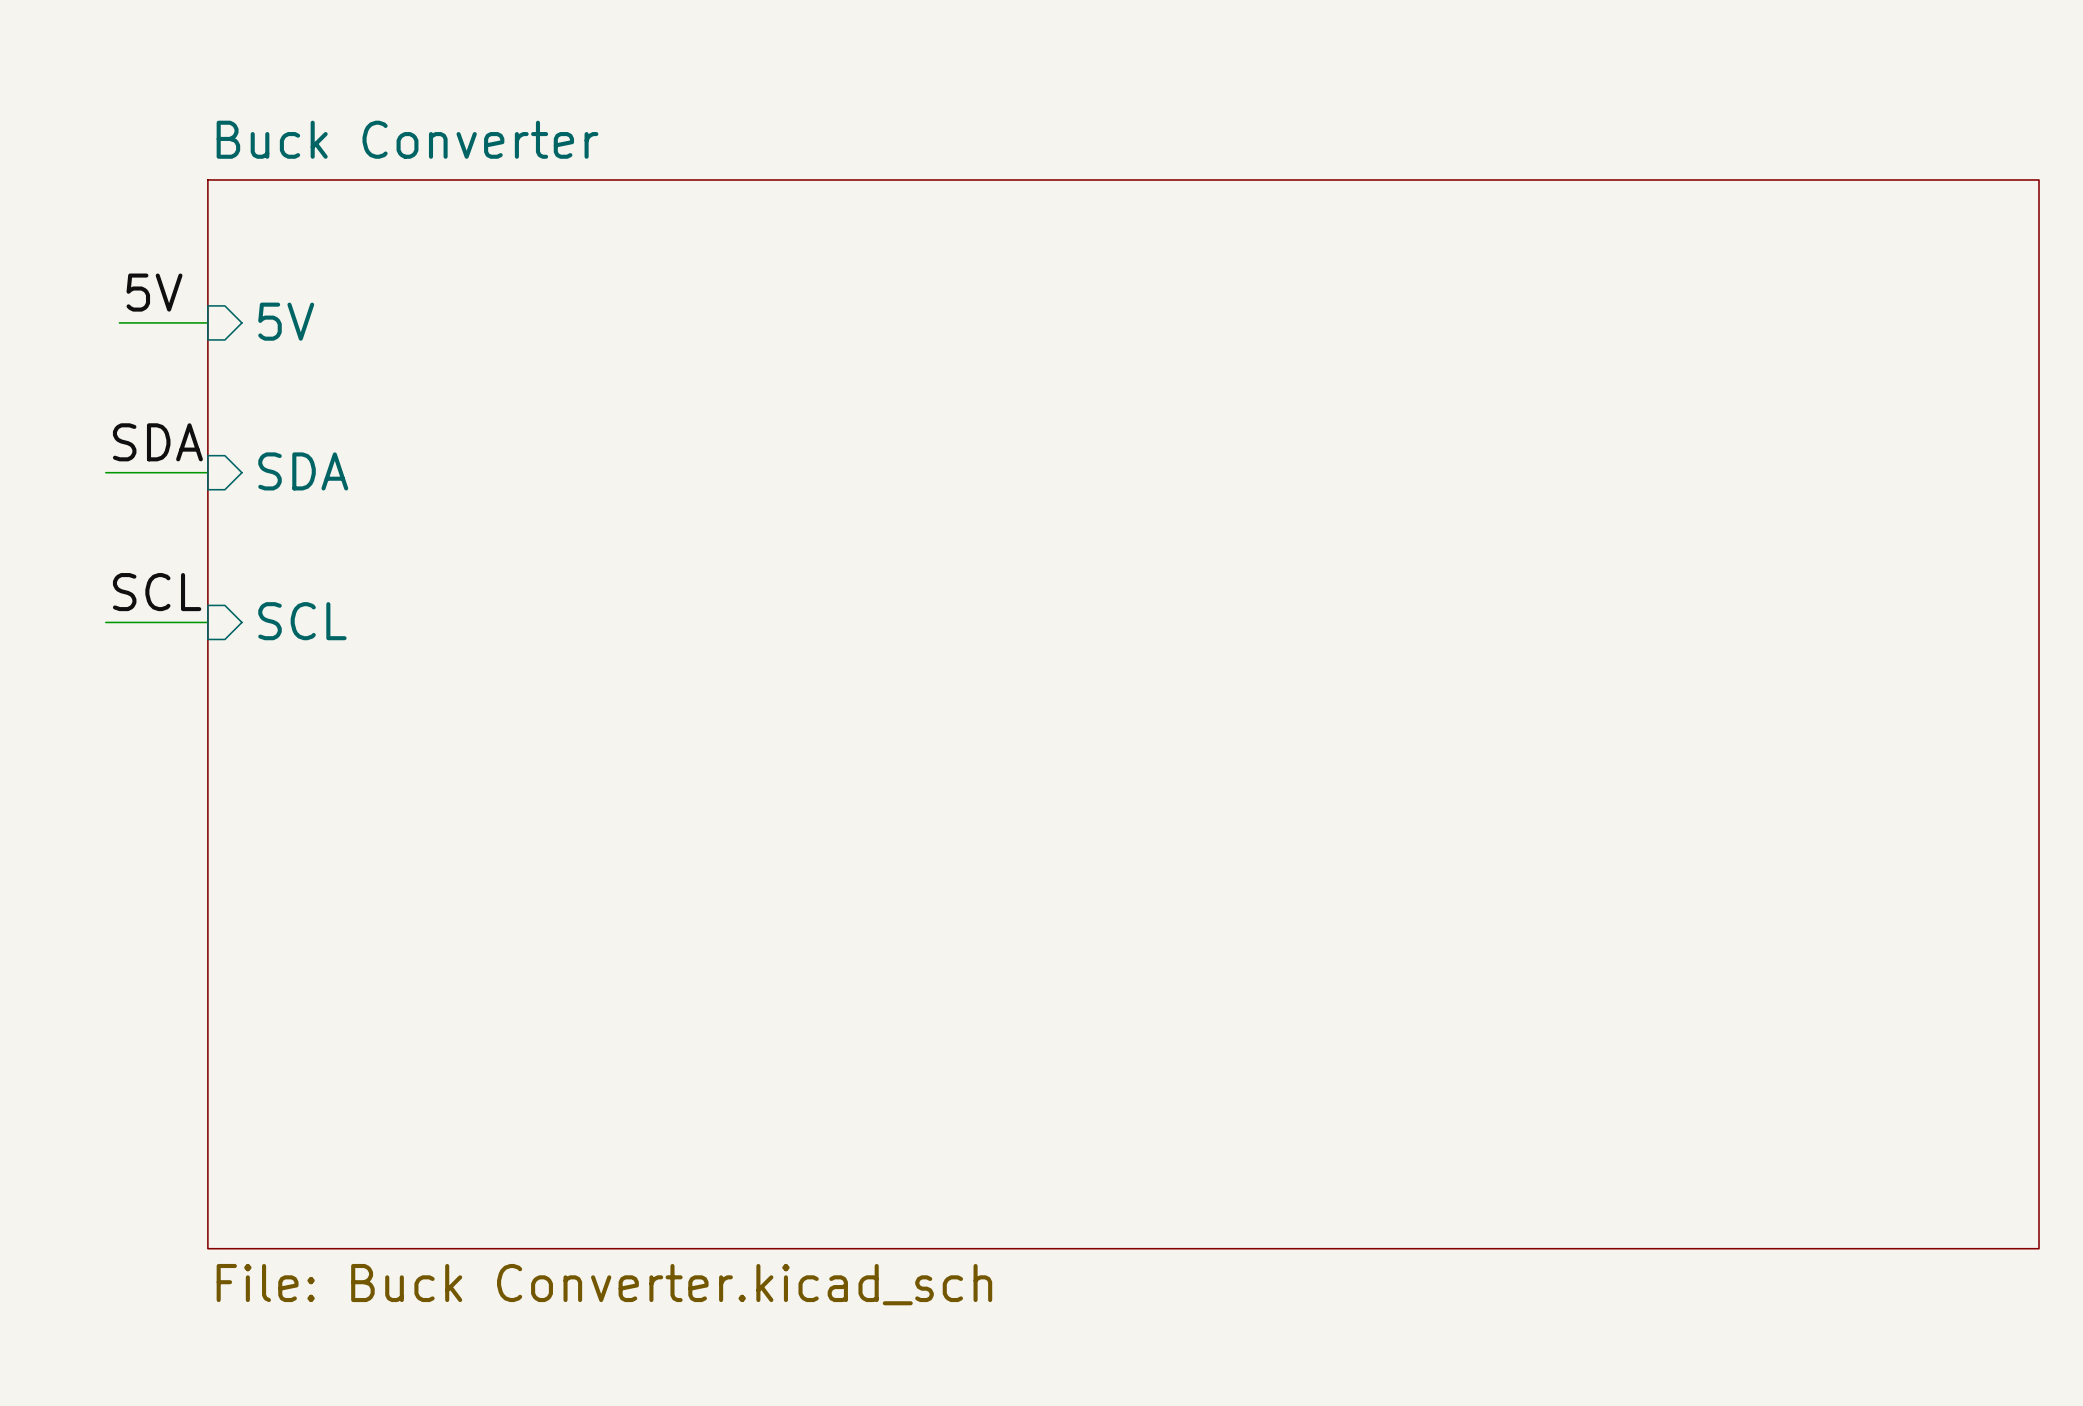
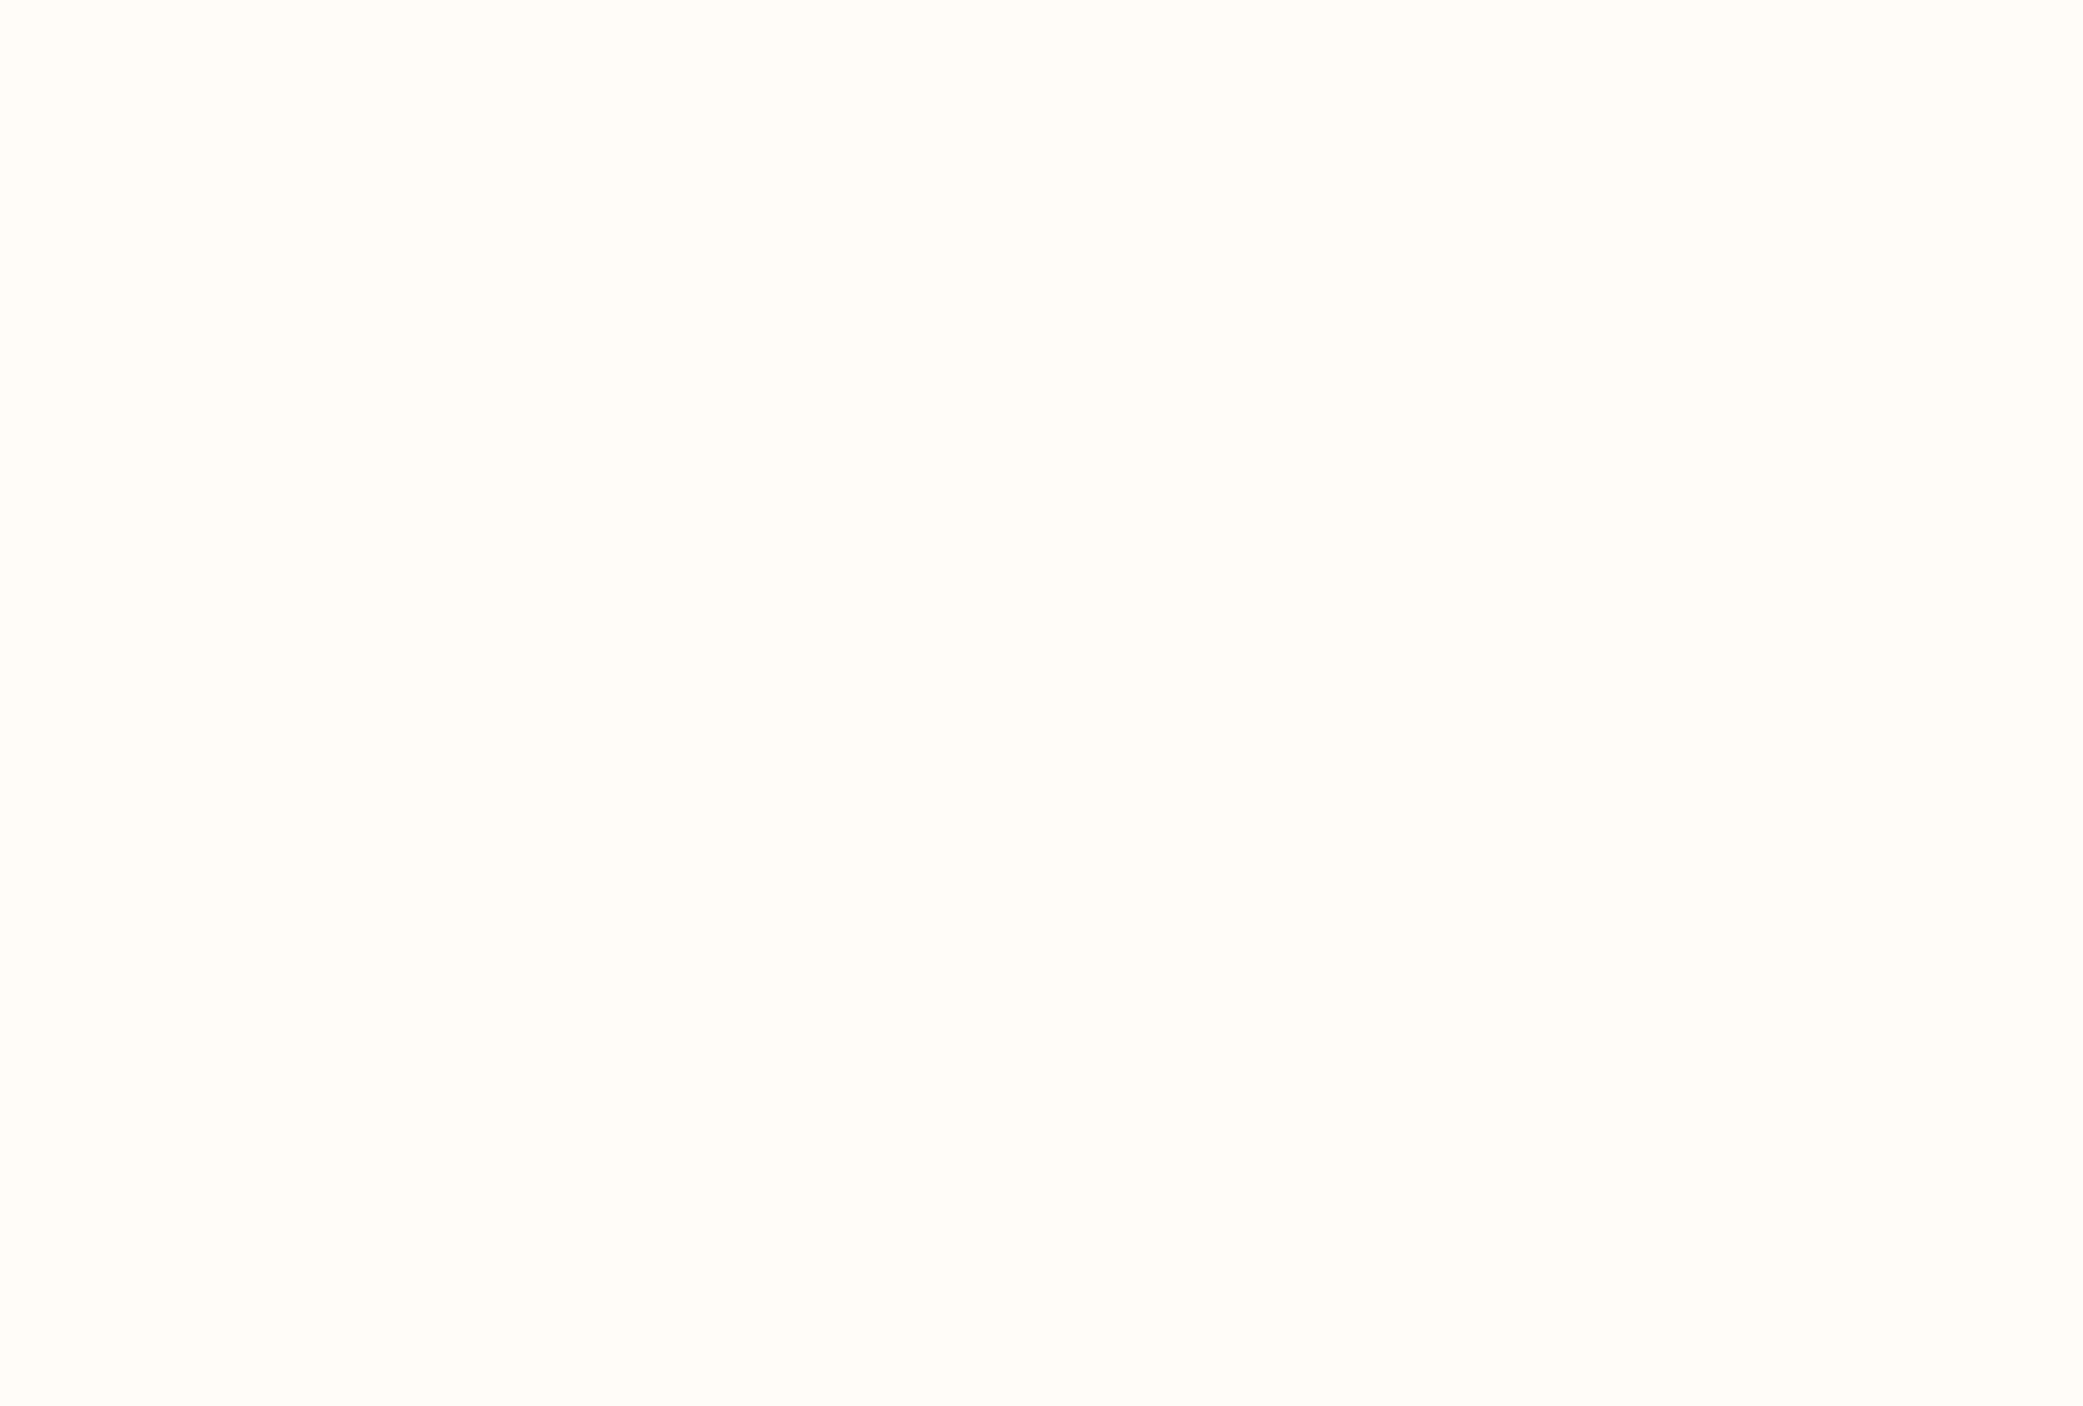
label: 5V (154, 292) -> none
sheet pin: 5V (286, 321) -> none
wire: (119, 322) (207, 322) -> none
label: SDA (157, 442) -> none
sheet pin: SDA (303, 471) -> none
wire: (105, 472) (207, 472) -> none
label: SCL (157, 592) -> none
sheet pin: SCL (302, 621) -> none
wire: (105, 622) (207, 622) -> none
sheet Buck Converter: File: Buck Converter.kicad_sch (1123, 714) -> none

